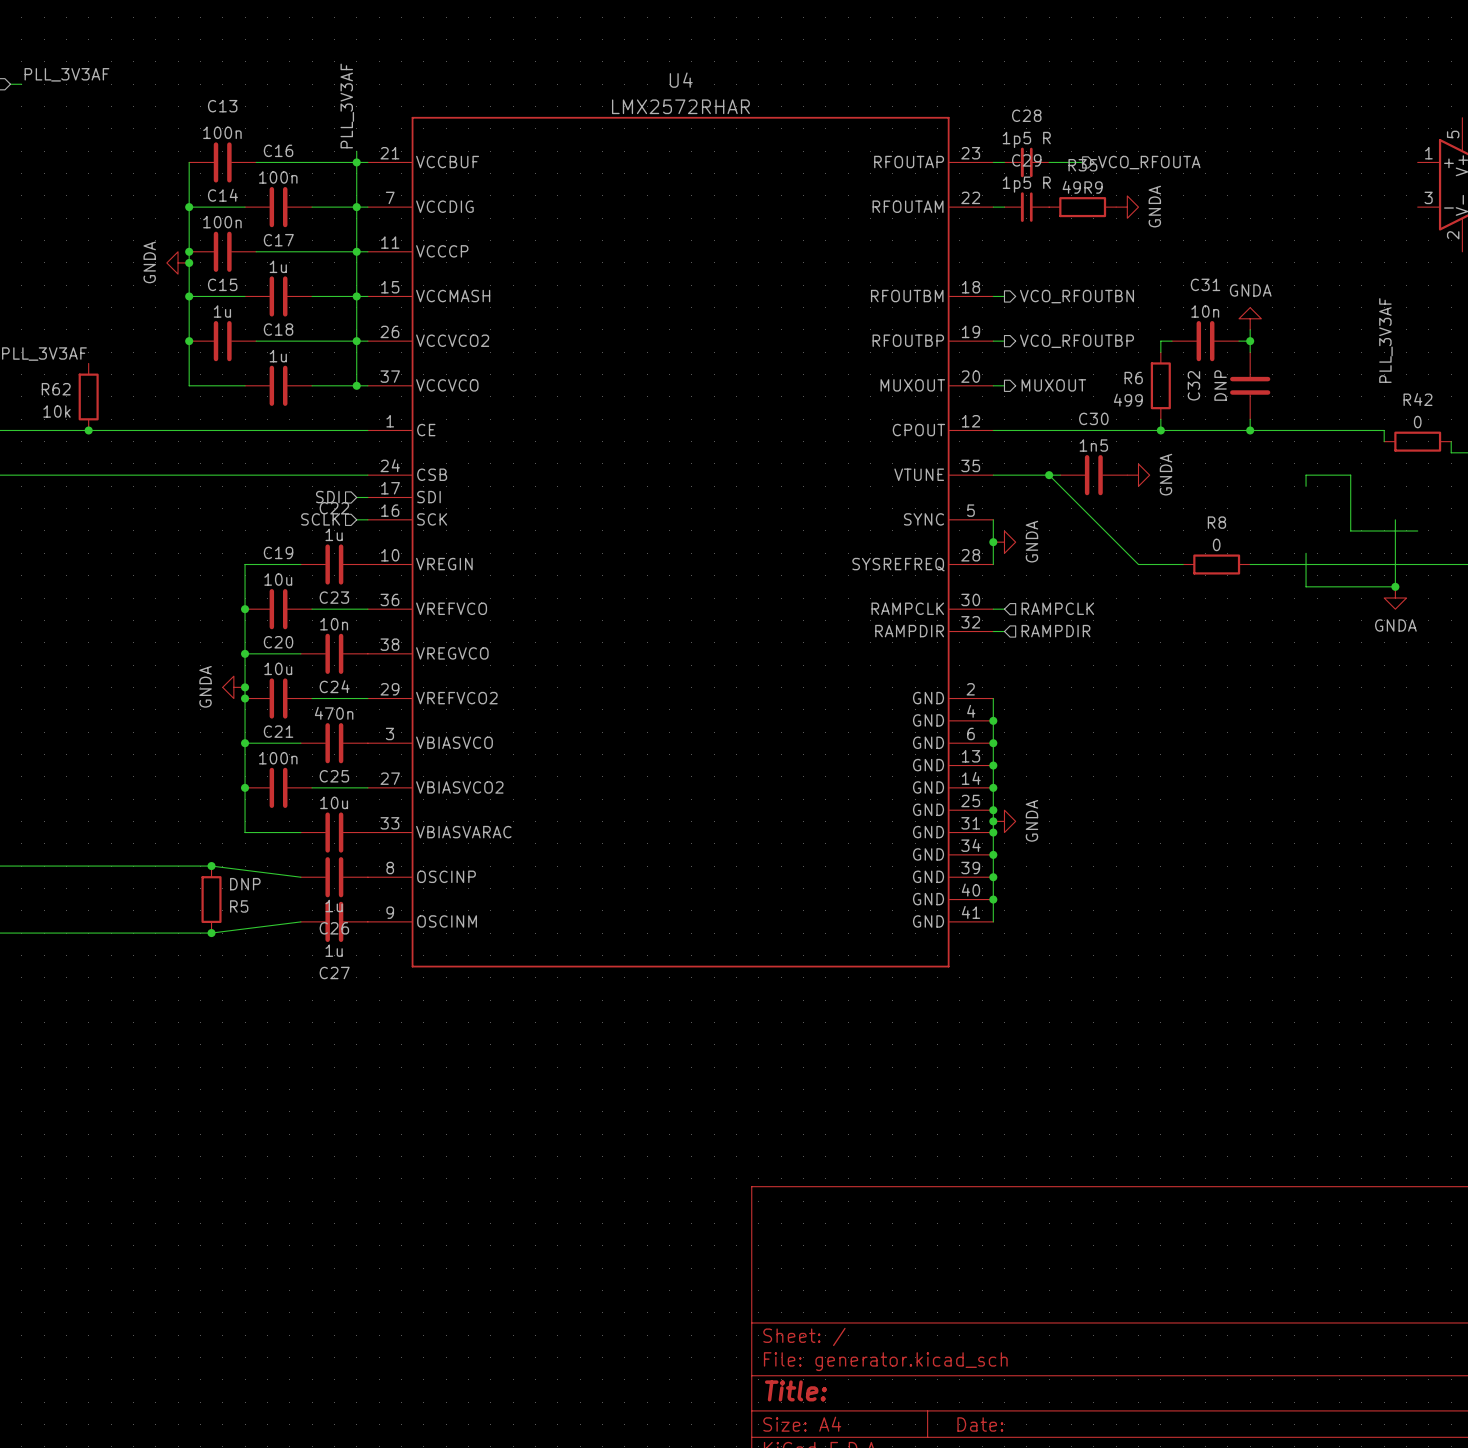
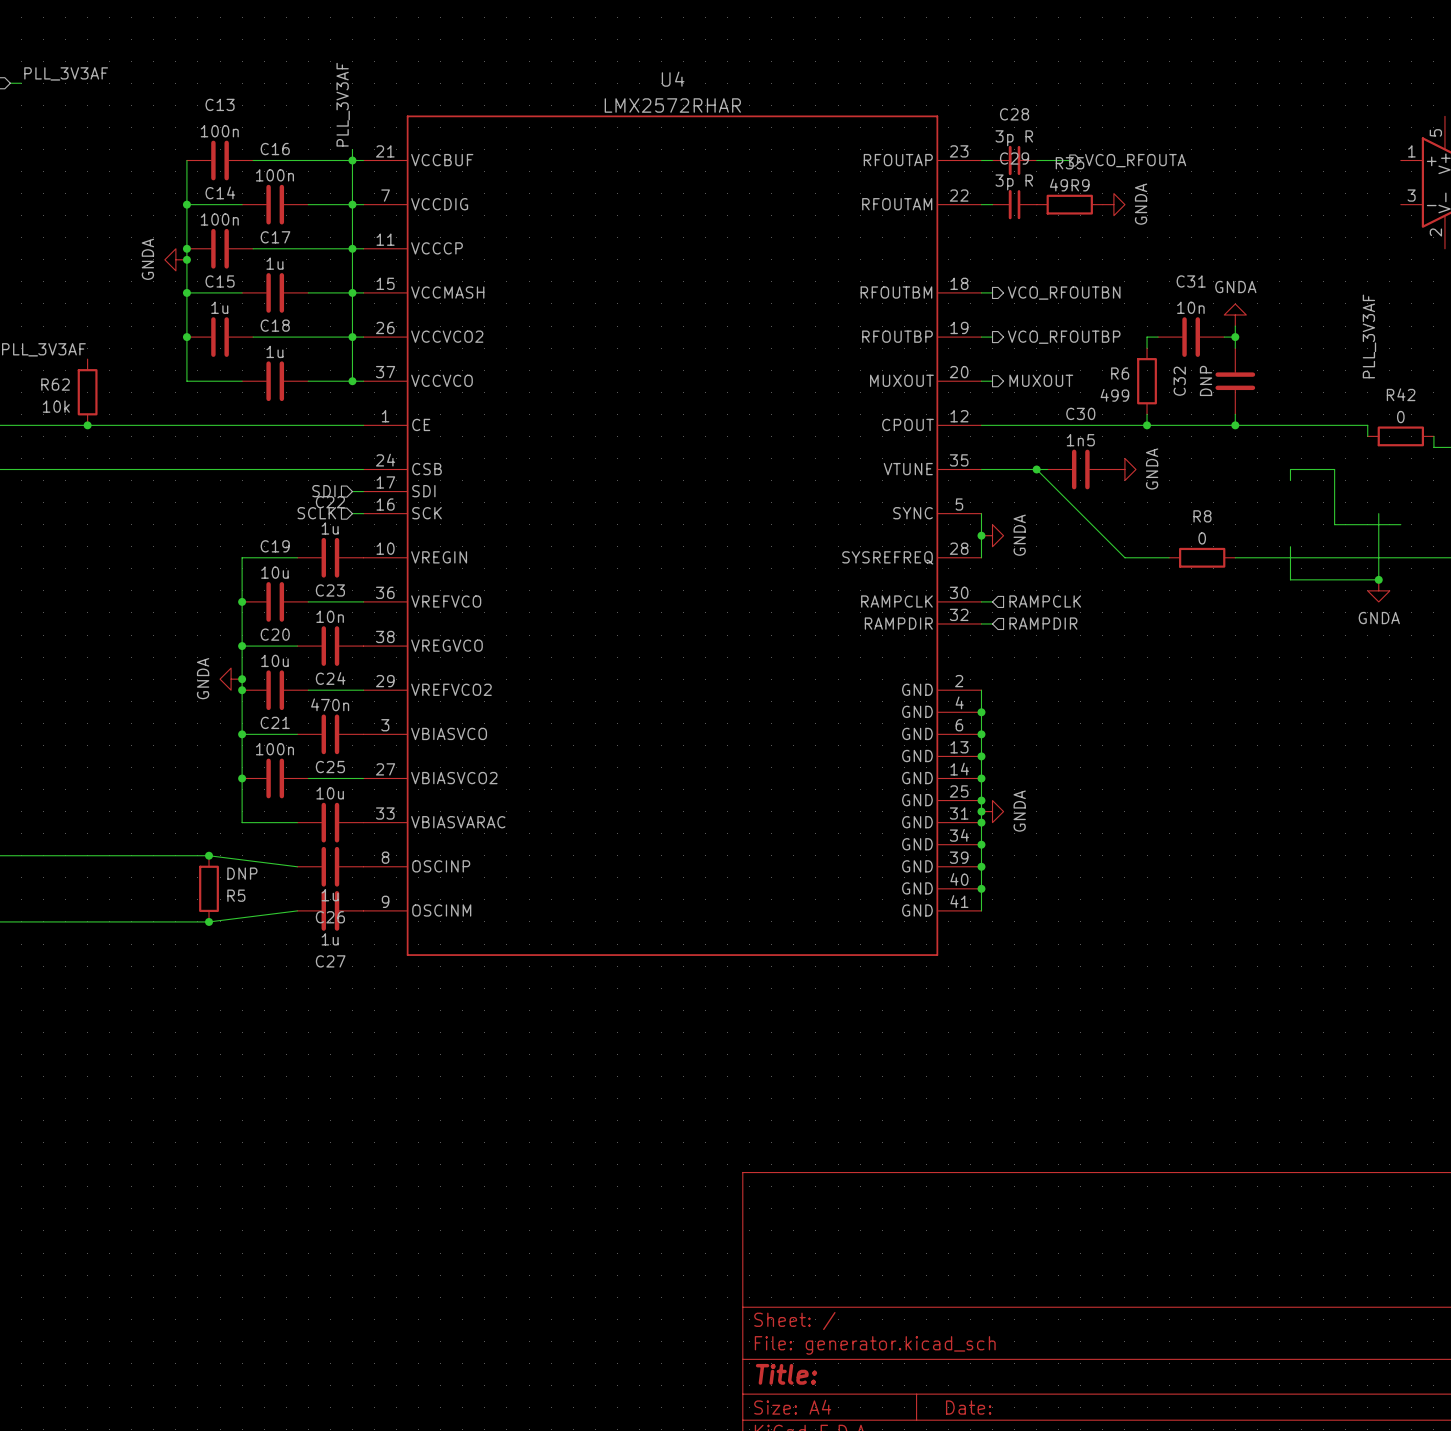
C28 value: 1p5 R (1026, 139) -> 3p R (1014, 138)
C29 value: 1p5 R (1026, 184) -> 3p R (1014, 182)

